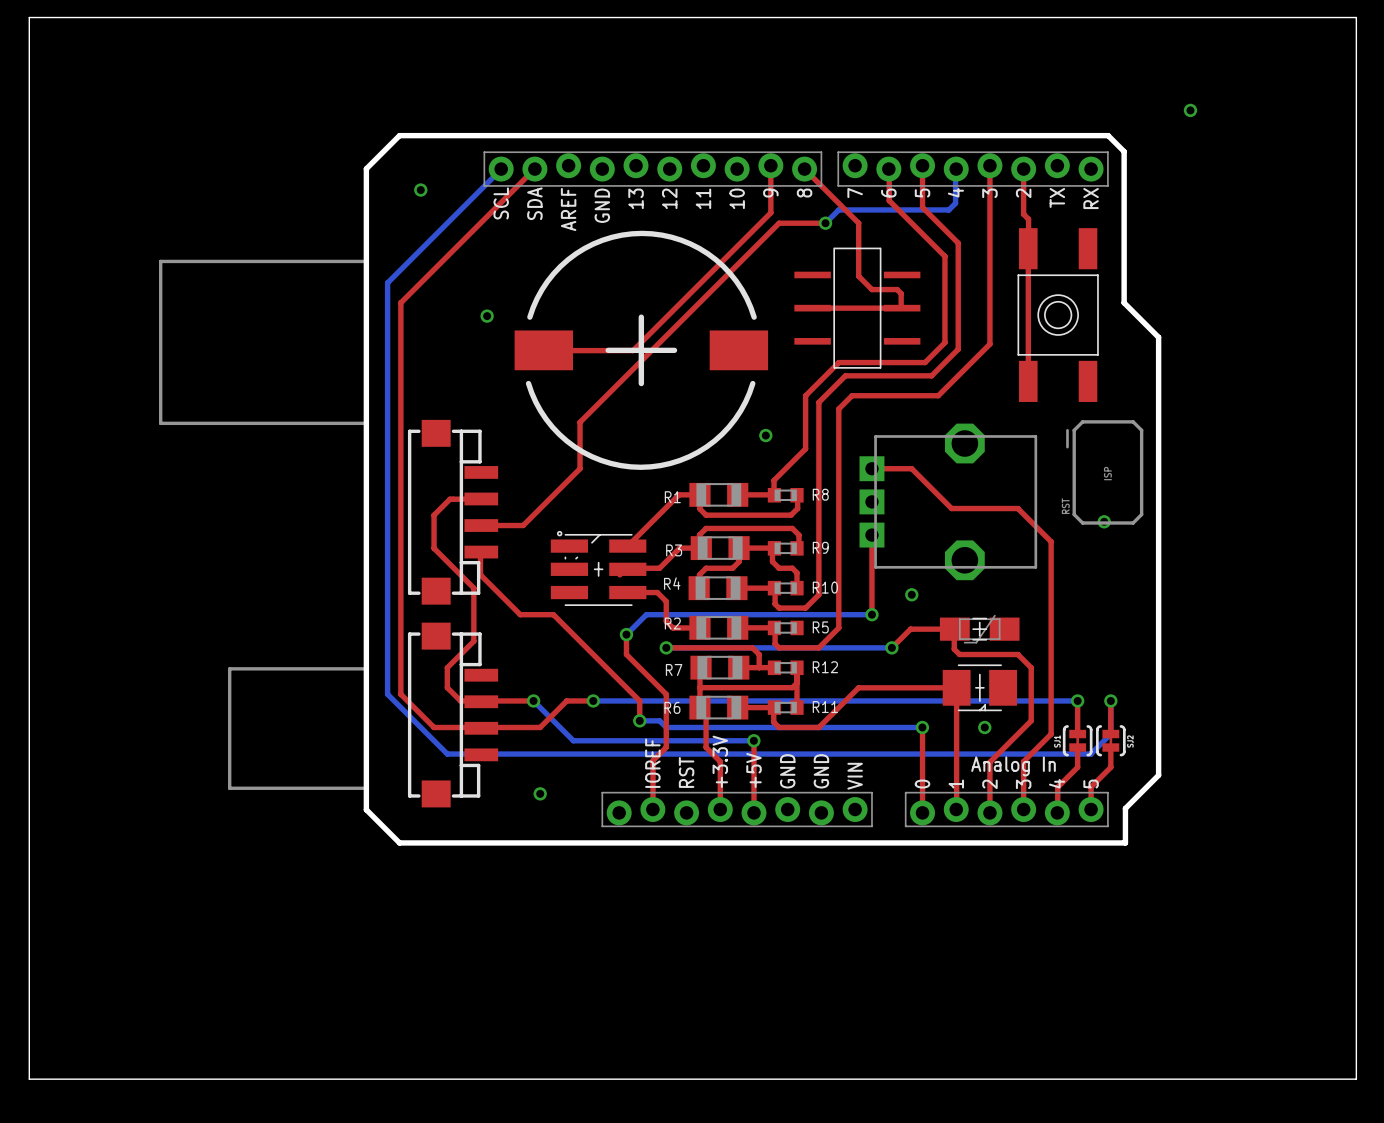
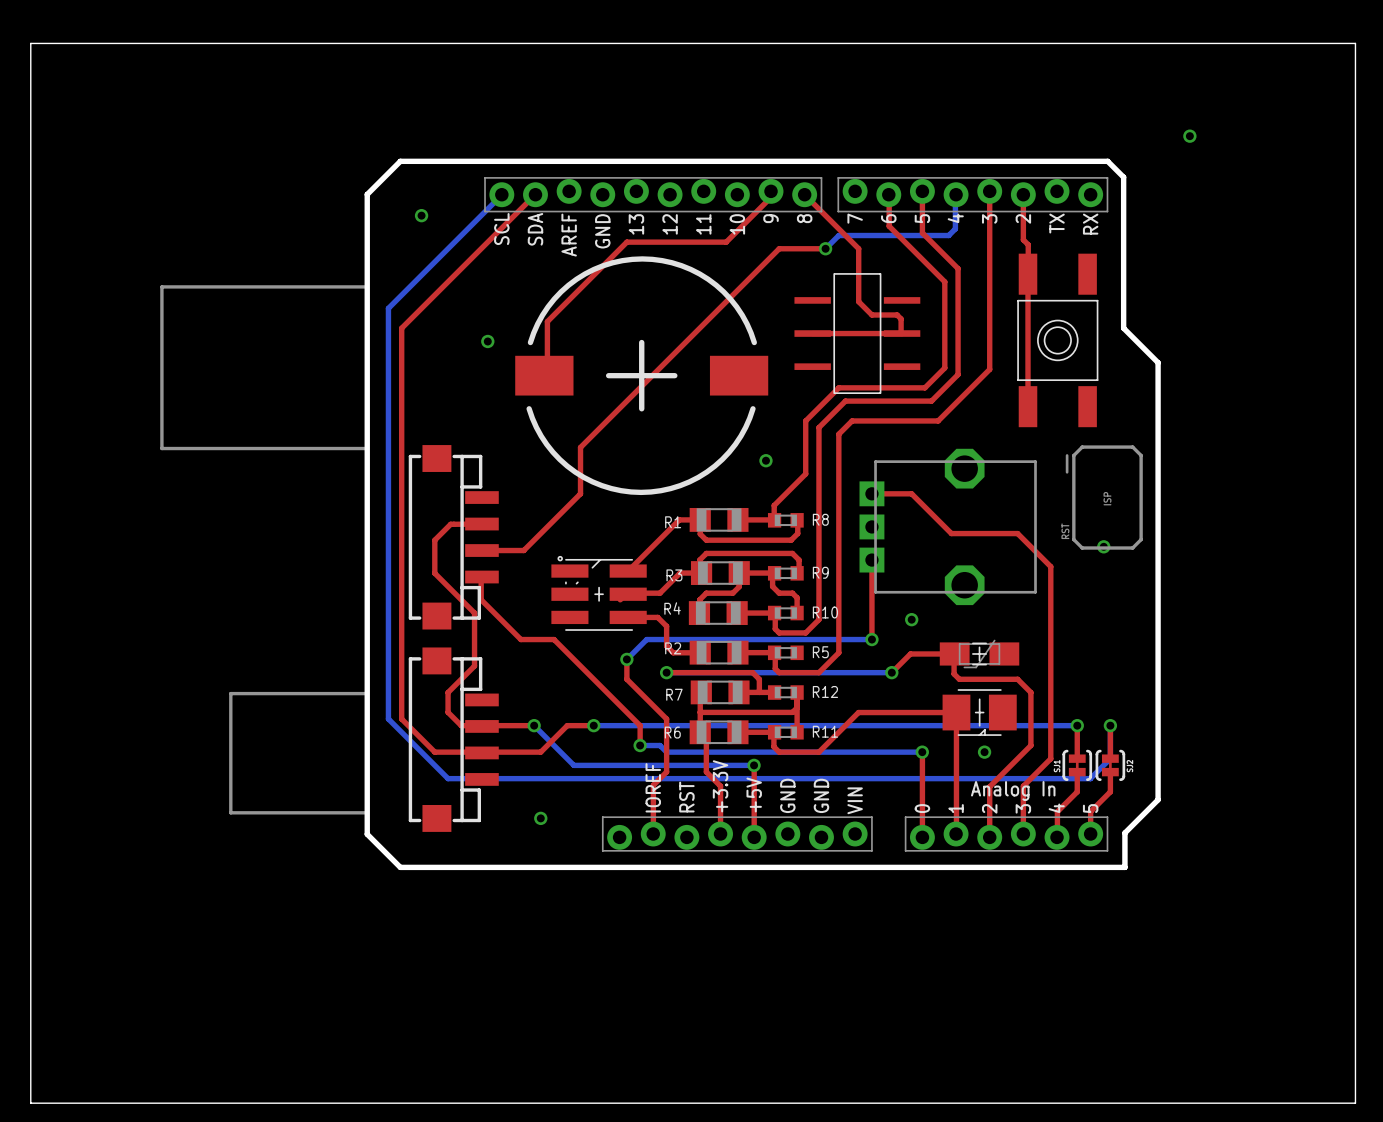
top track: (770, 171) (770, 212) (633, 350) (543, 350) -> (771, 197) (726, 242) (626, 242) (547, 321) (547, 385) (544, 375)

